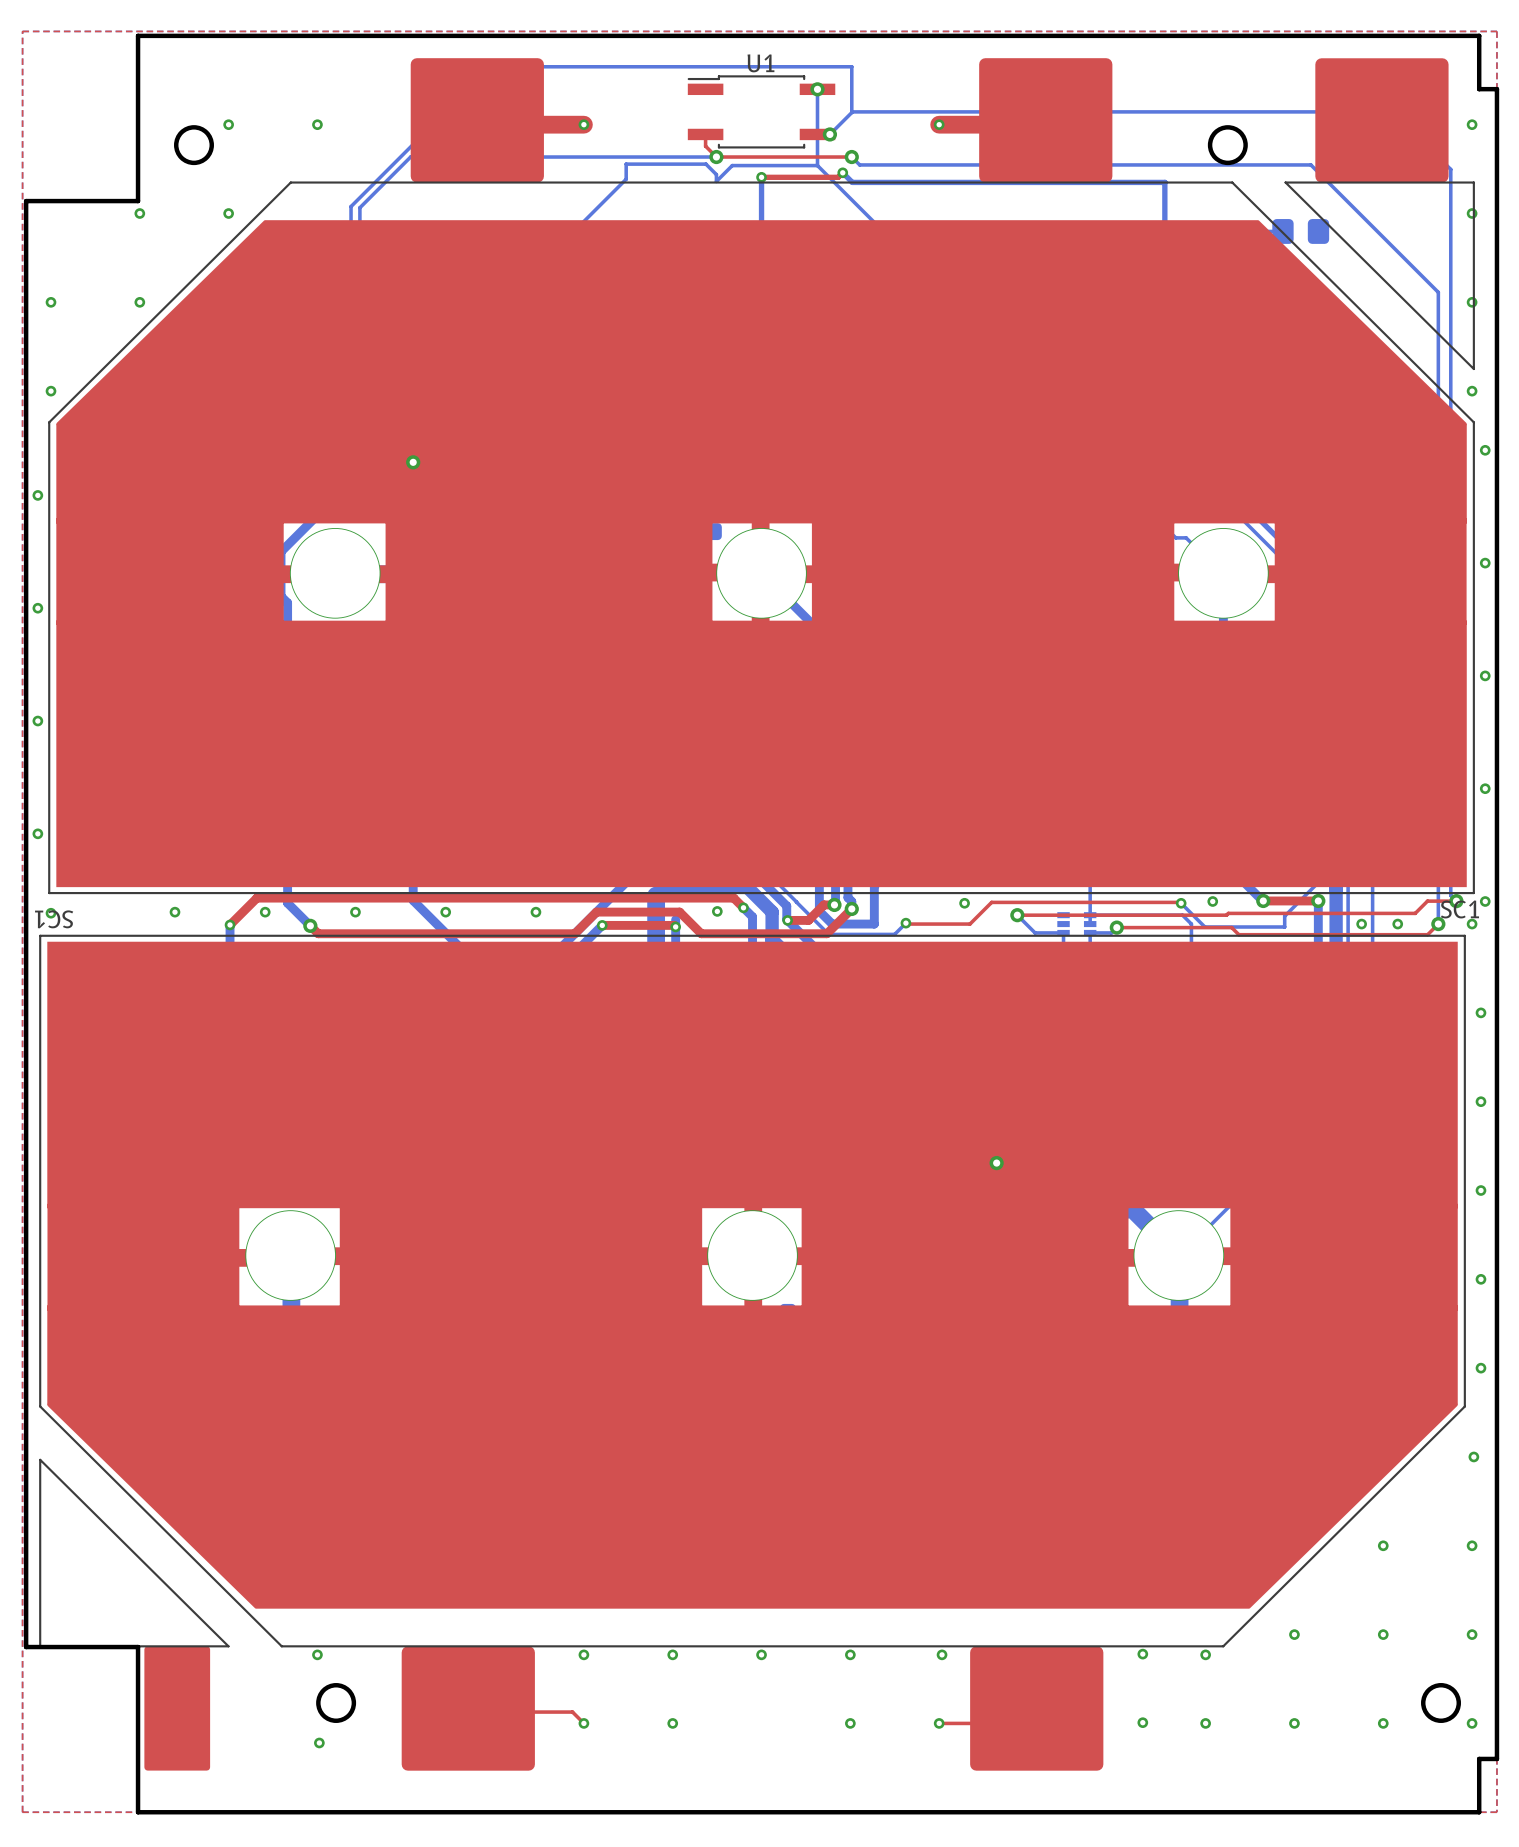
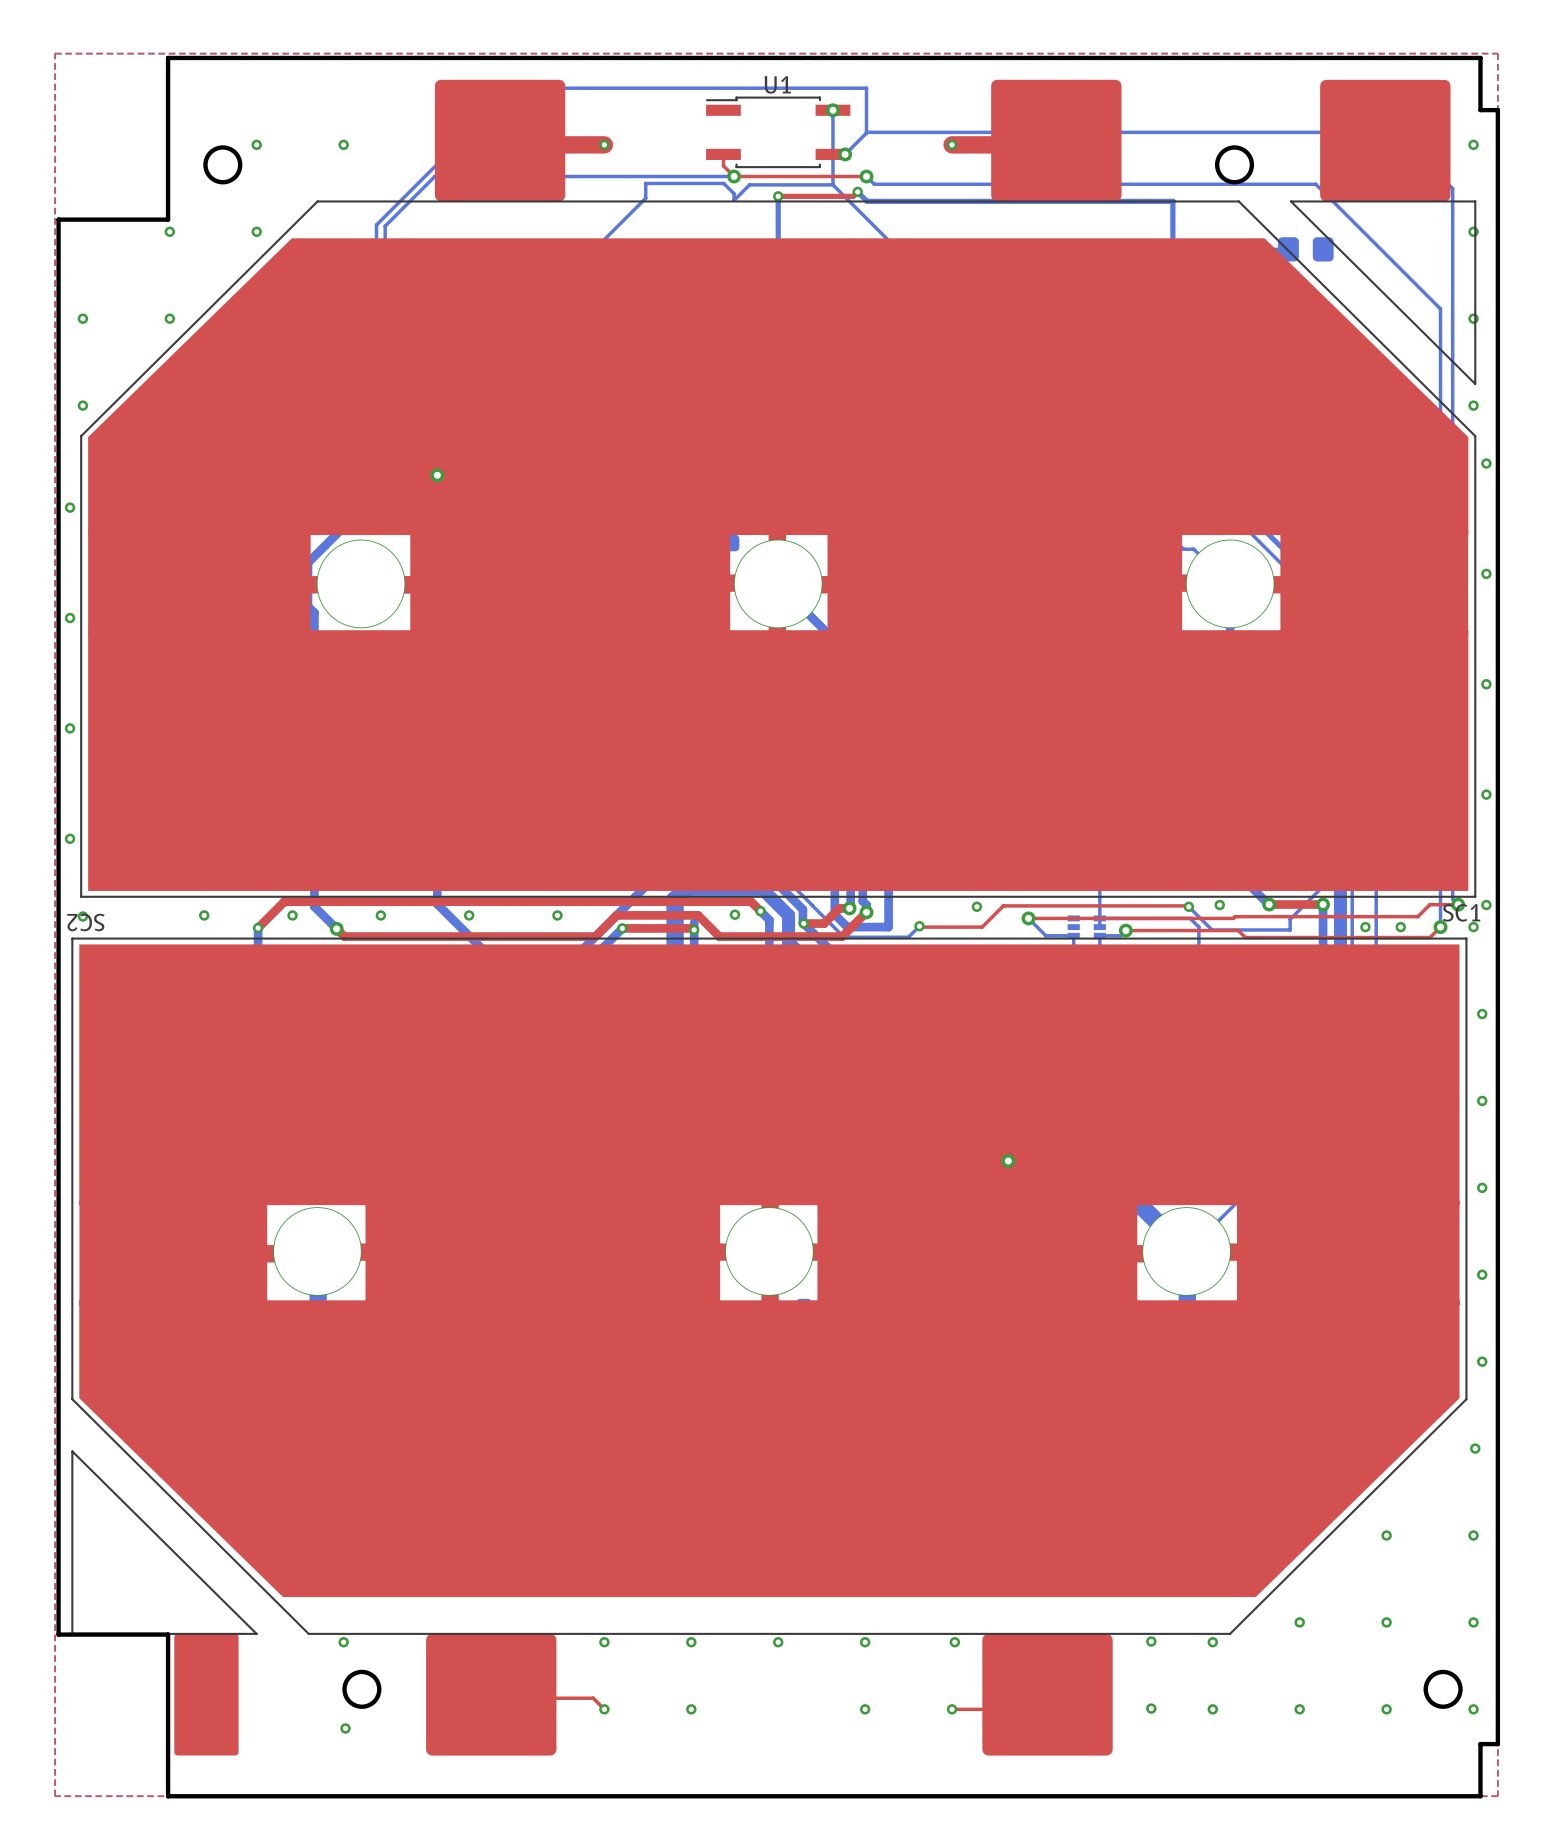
SC1 name: SC1 (54, 919) -> SC2 (85, 922)

